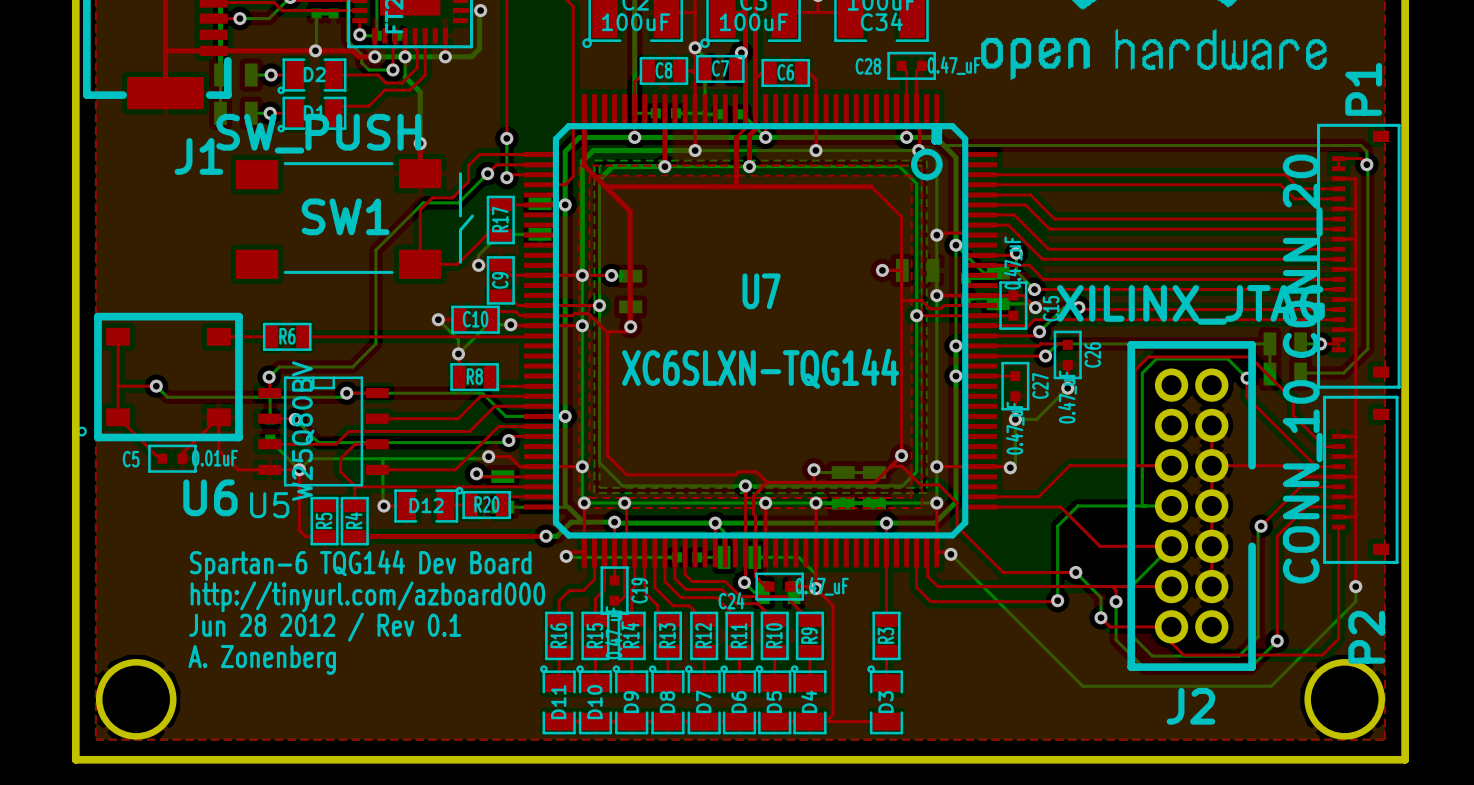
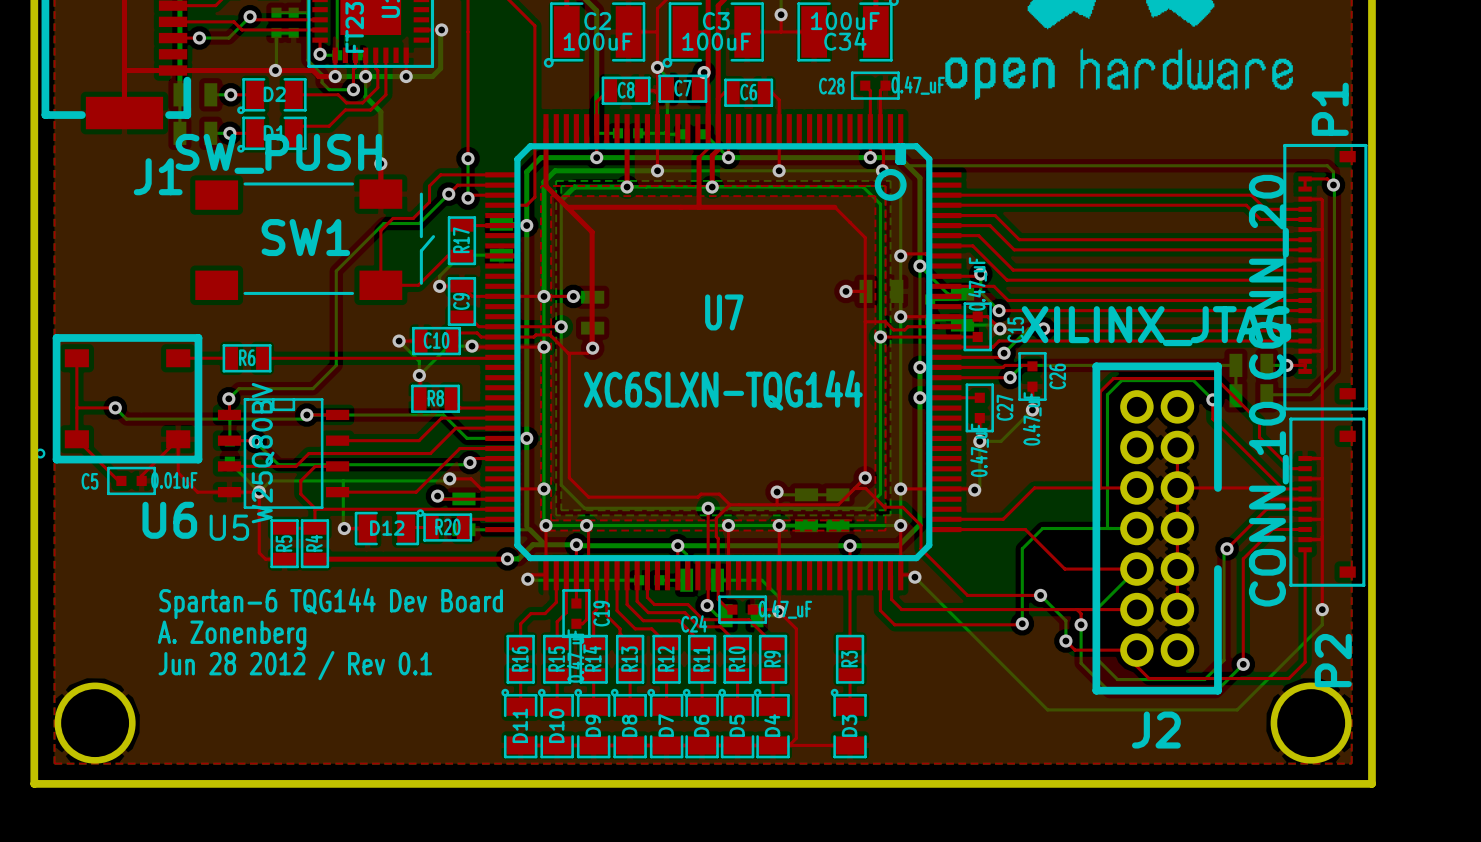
text position: Spartan-6 TQG144 Dev Board (360, 565) -> Spartan-6 TQG144 Dev Board (331, 603)
text: http://tinyurl.com/azboard000 (367, 596) -> none
text position: Jun 28 2012 / Rev 0.1 (325, 627) -> Jun 28 2012 / Rev 0.1 (295, 665)
text position: A. Zonenberg (262, 659) -> A. Zonenberg (232, 635)

